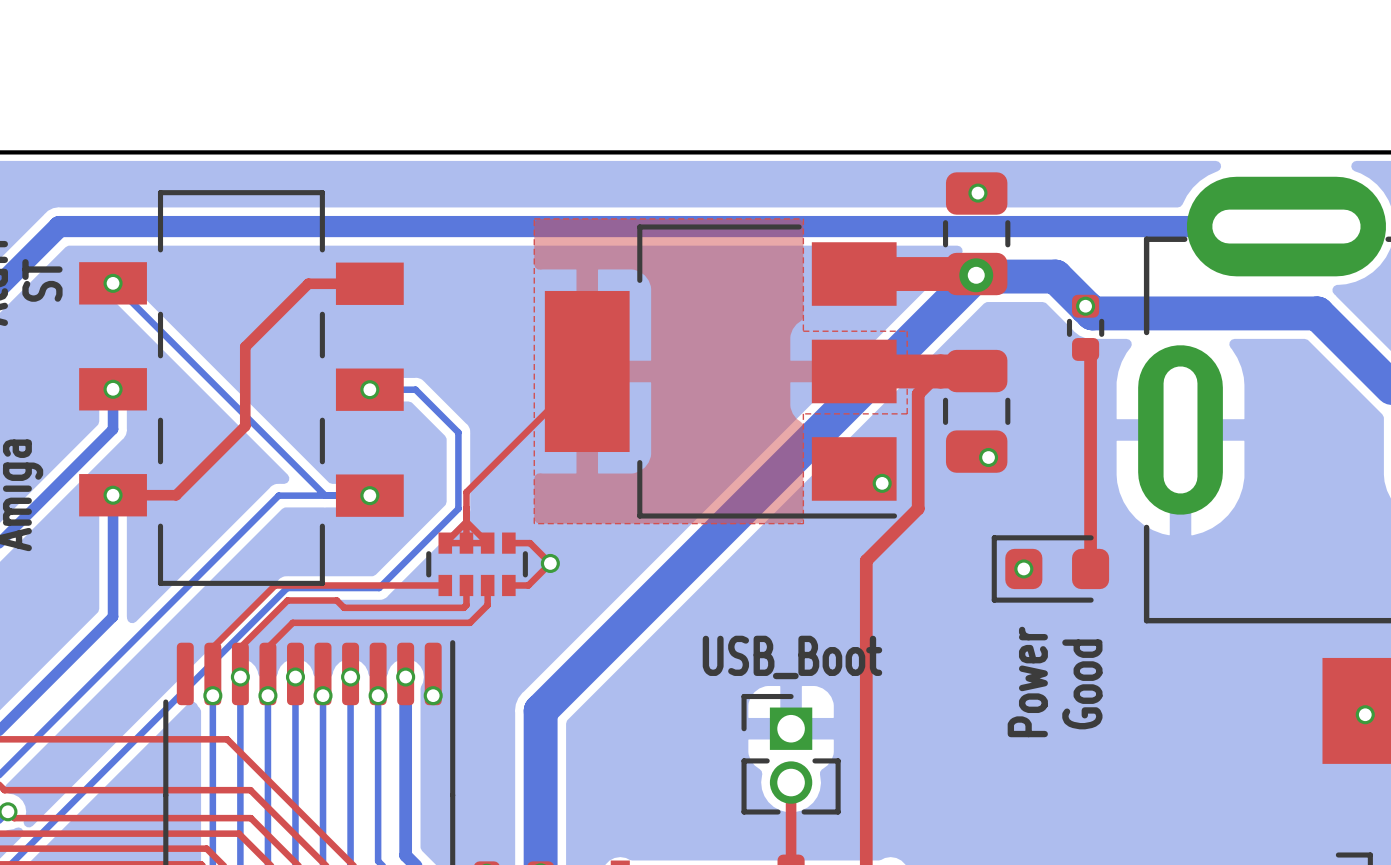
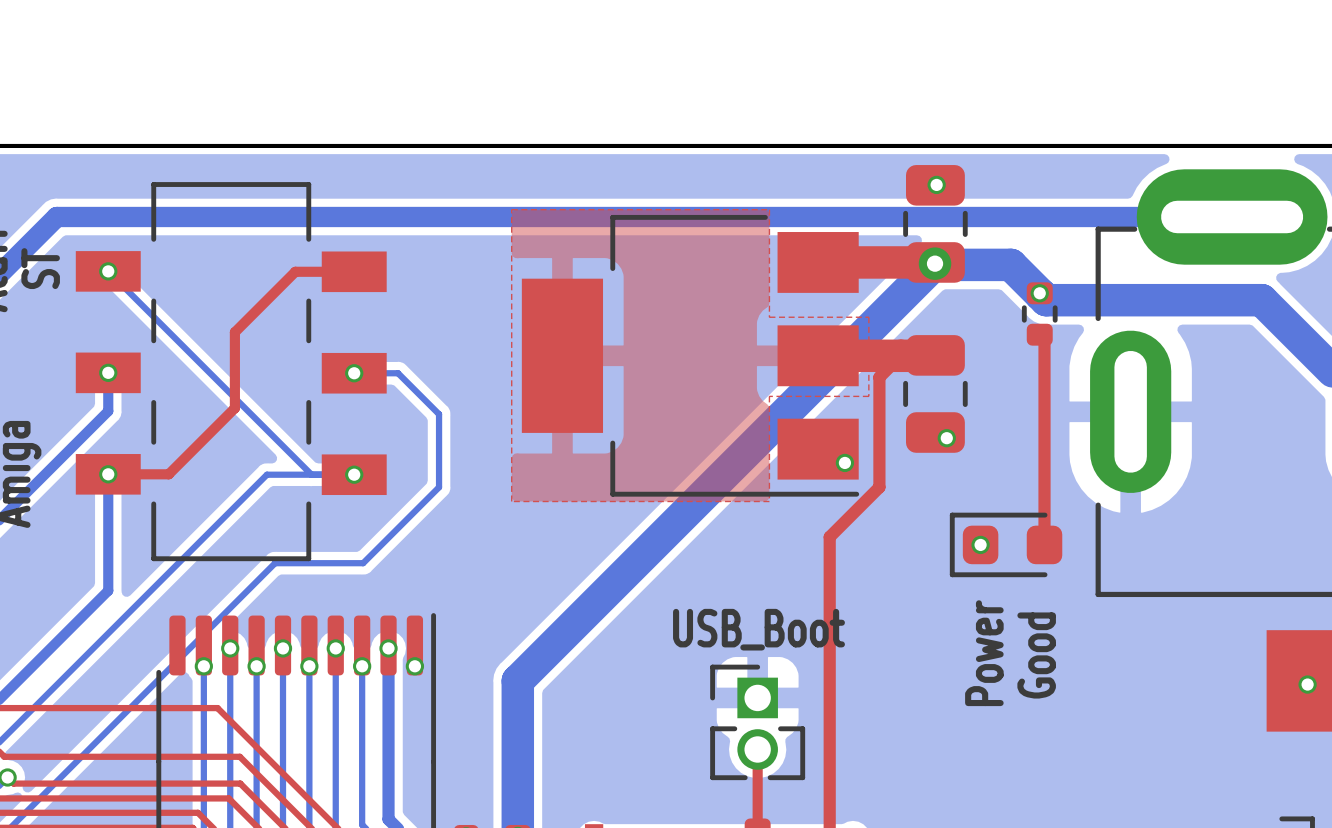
top track: (587, 371) (466, 492) (466, 543) -> none
top track: (466, 521) (487, 543) (445, 543) (466, 521) -> none
top track: (508, 543) (530, 543) (550, 563) (528, 585) (508, 585) -> none
via: (550, 563) -> none
part: (477, 564) -> none
top track: (445, 585) (275, 585) (212, 647) (212, 673) -> none
top track: (466, 585) (466, 605) (463, 607) (344, 607) (336, 600) (287, 600) (240, 647) (240, 673) -> none
top track: (487, 585) (487, 605) (470, 622) (292, 622) (267, 647) (267, 673) -> none

